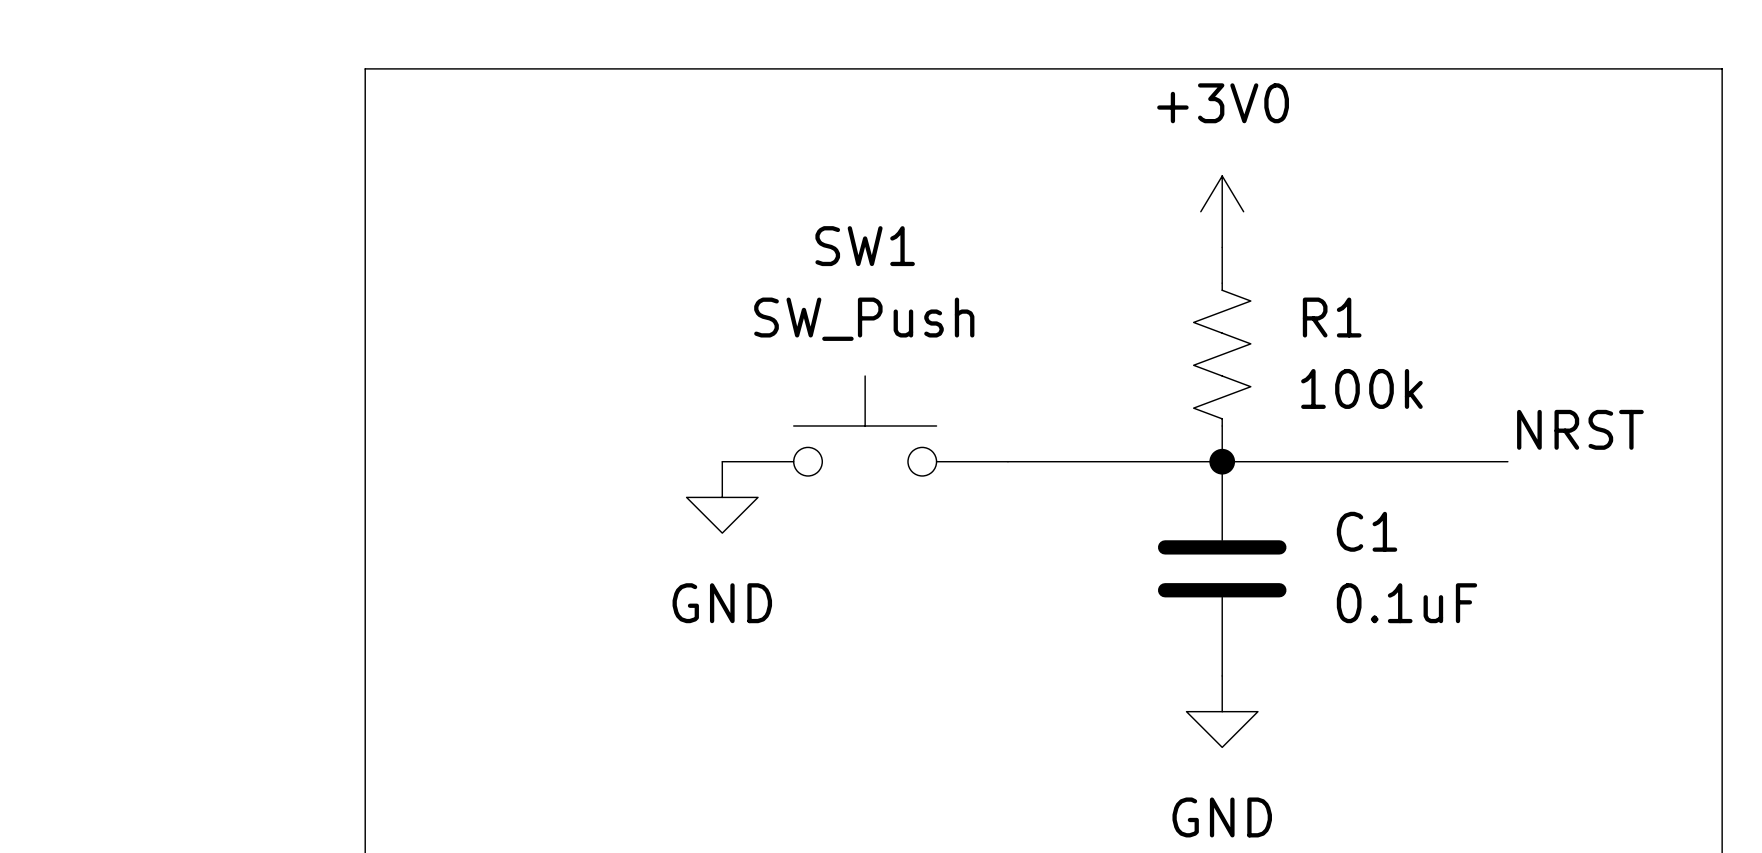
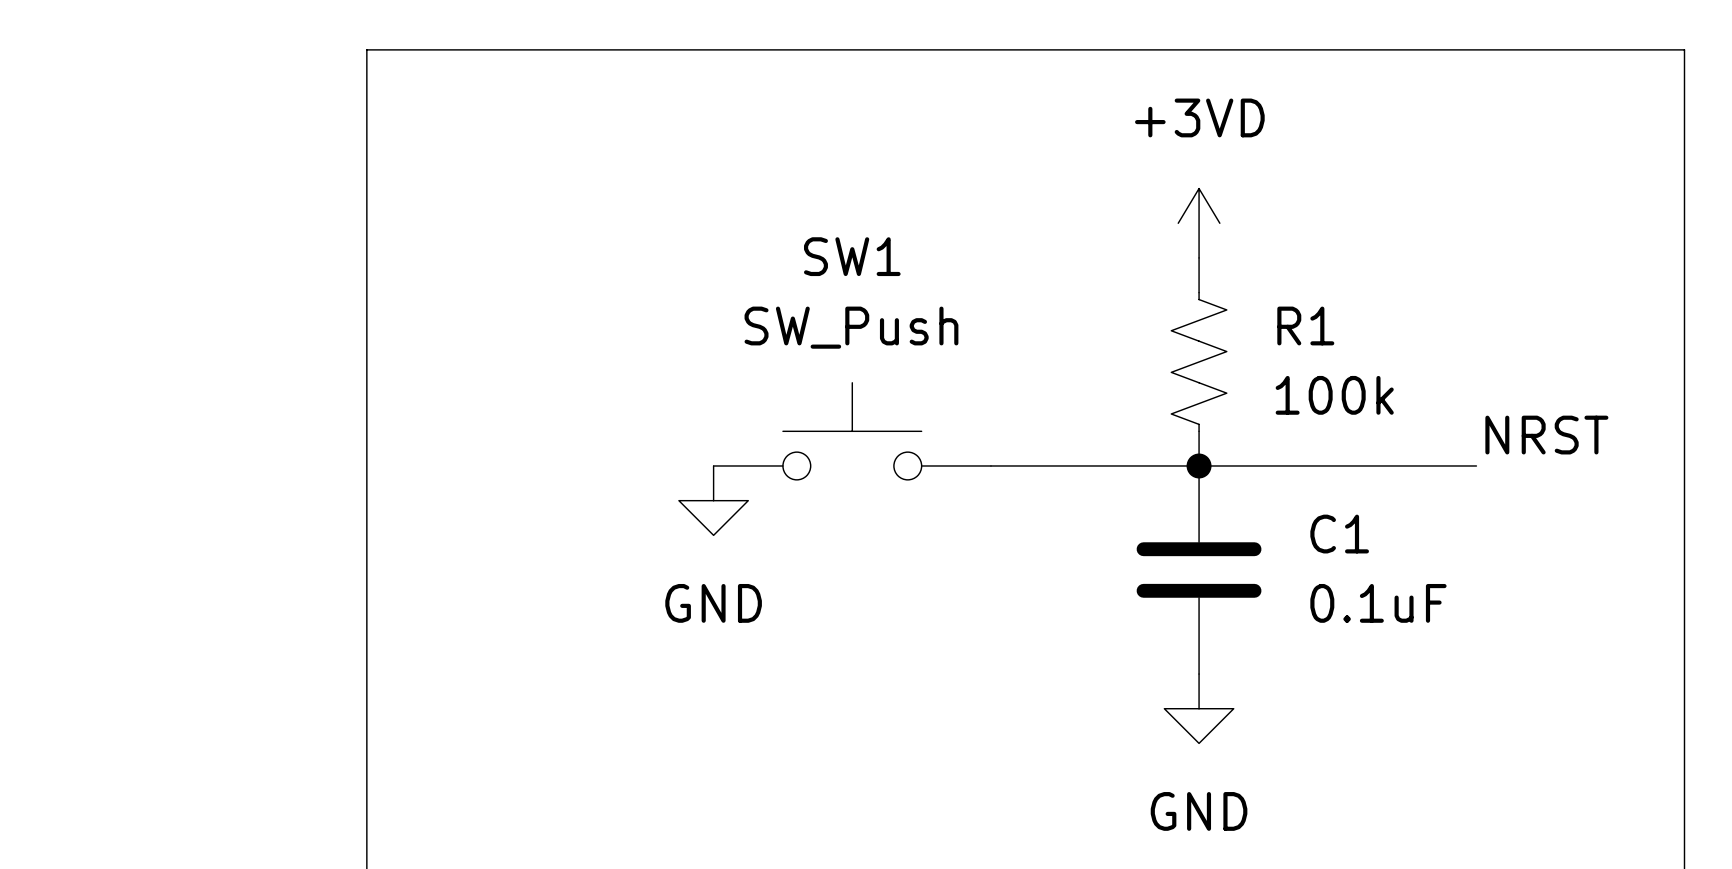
line: (365, 68) (1722, 68) -> (366, 84) (366, 49) (1684, 49) (1684, 84)
power symbol: +3V0 (1222, 211) -> +3VD (1199, 223)

